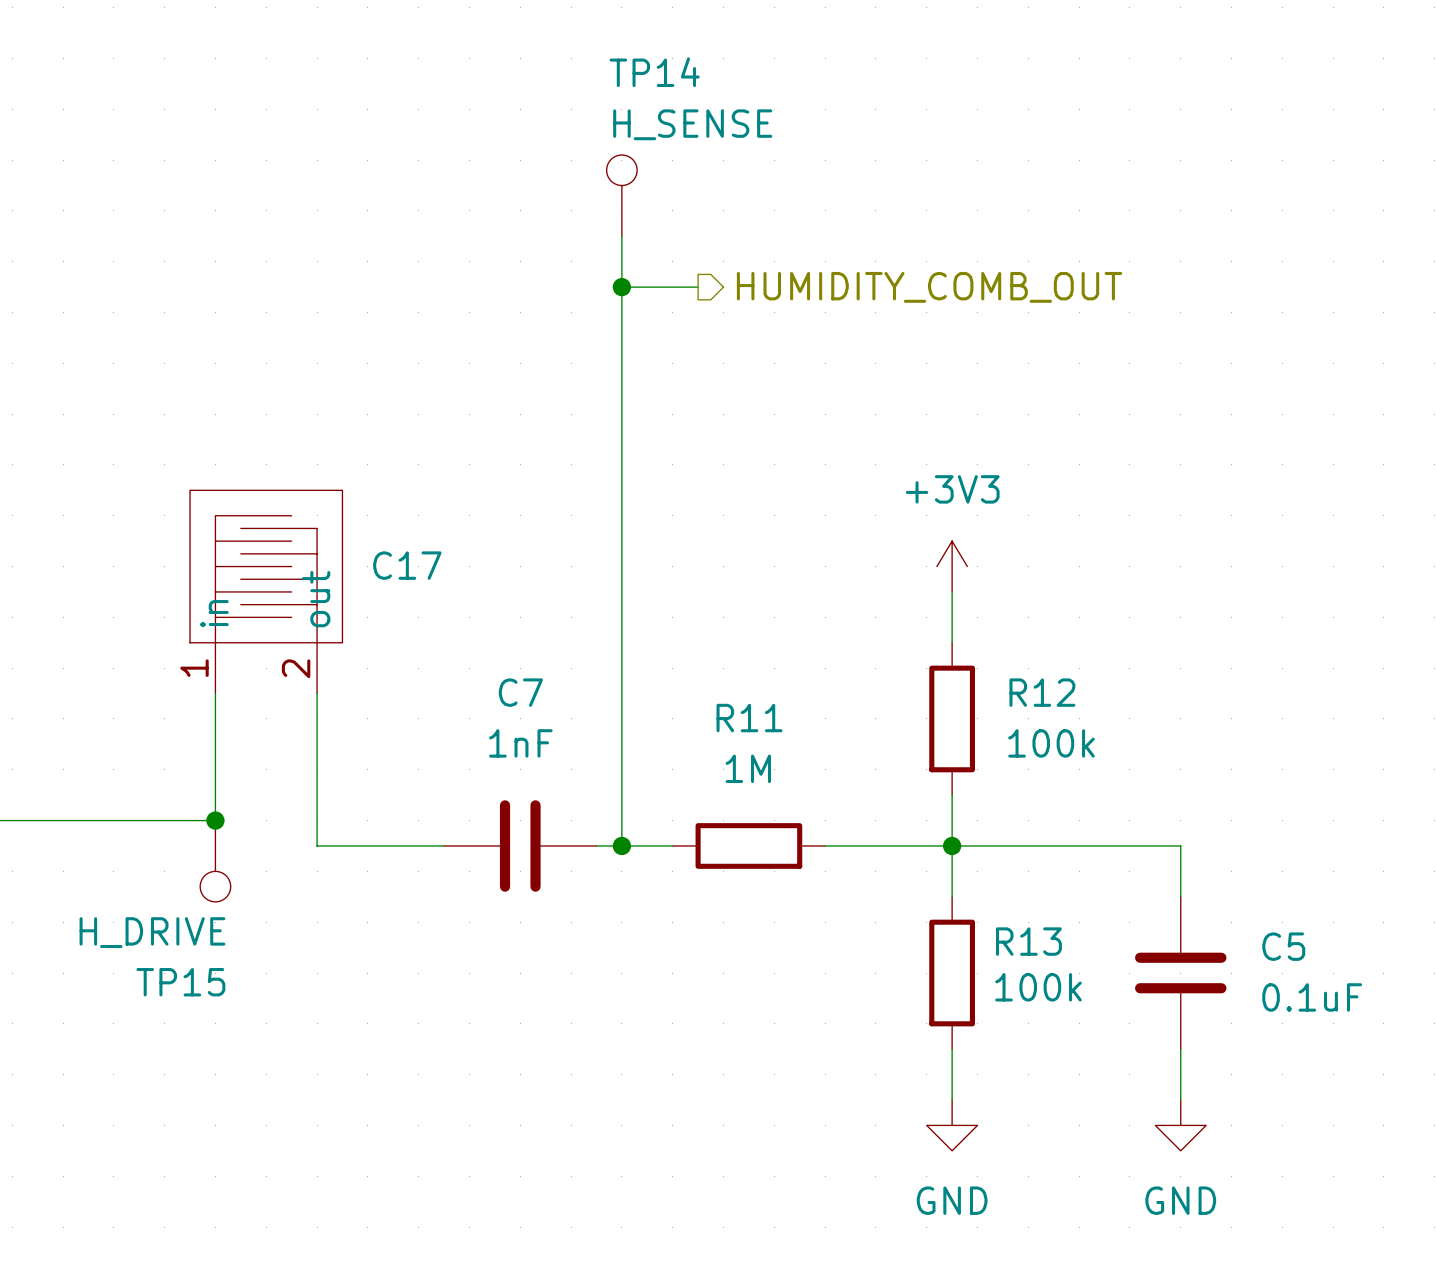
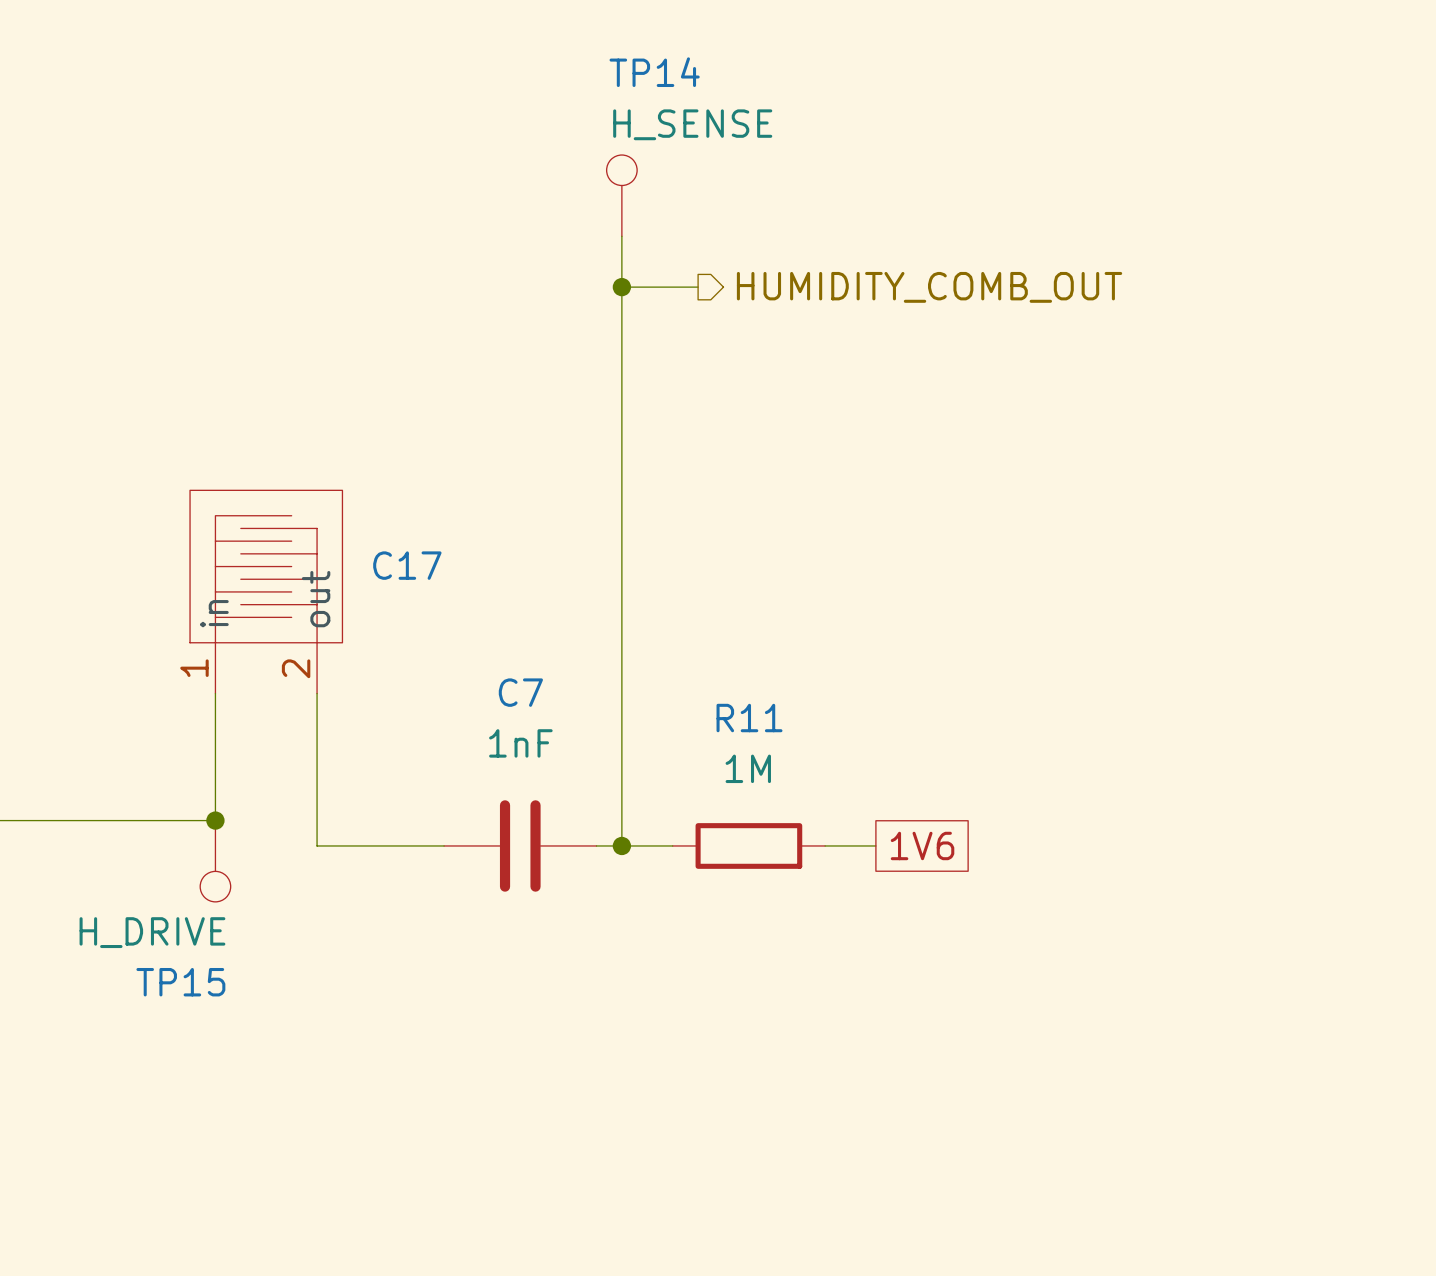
power symbol: +3V3 (952, 566) -> none
wire: (952, 591) (952, 642) -> none
R12: 100k (952, 718) -> none
wire: (952, 795) (952, 896) -> none
wire: (875, 845) (1180, 845) (1180, 896) -> none
global label: none -> 1V6 (922, 845)
junction: (952, 845) -> none
R13: 100k (952, 973) -> none
C5: 0.1uF (1180, 973) -> none
wire: (952, 1049) (952, 1100) -> none
wire: (1180, 1049) (1180, 1100) -> none
power symbol: GND (952, 1125) -> none
power symbol: GND (1180, 1125) -> none

